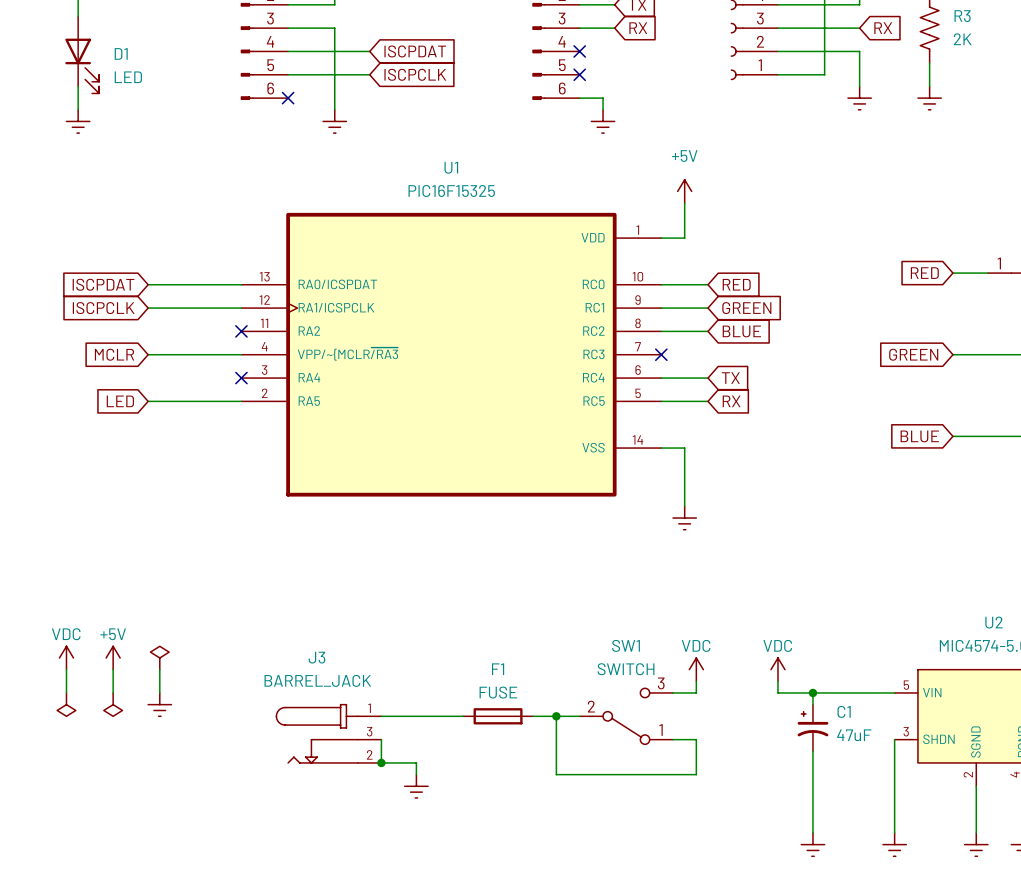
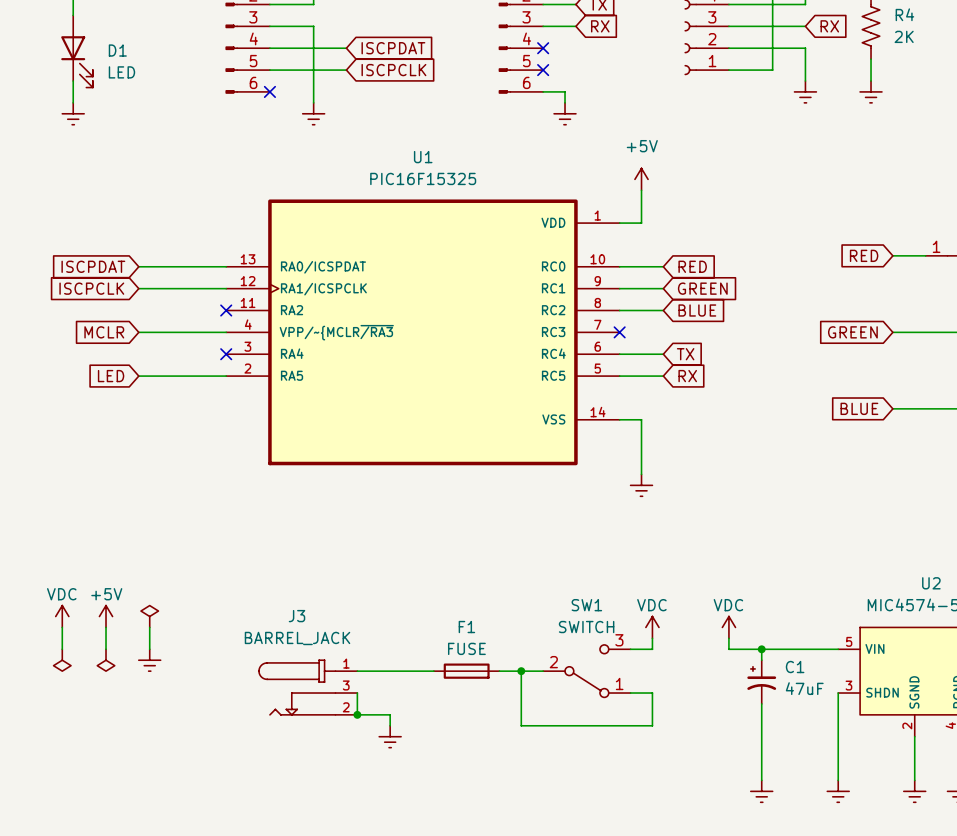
R3 name: R3 (962, 16) -> R4 (904, 14)

